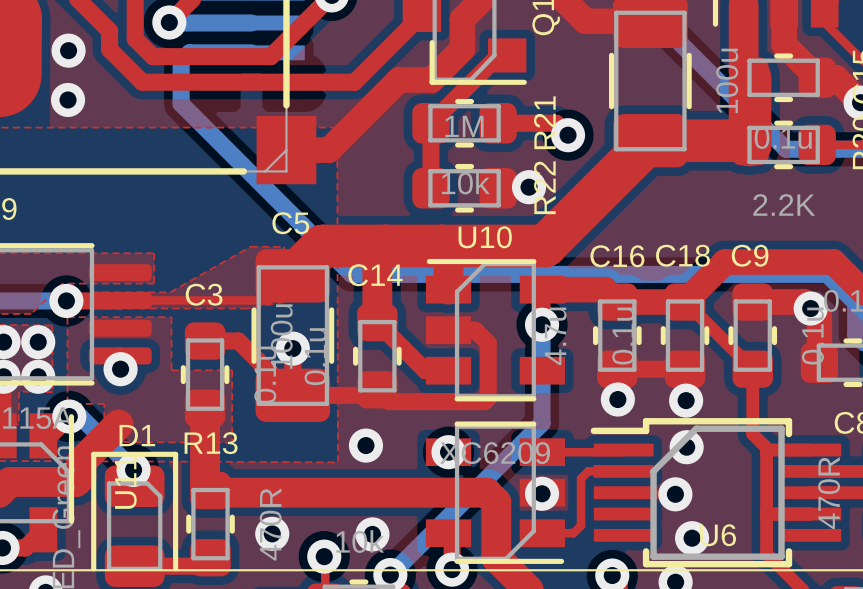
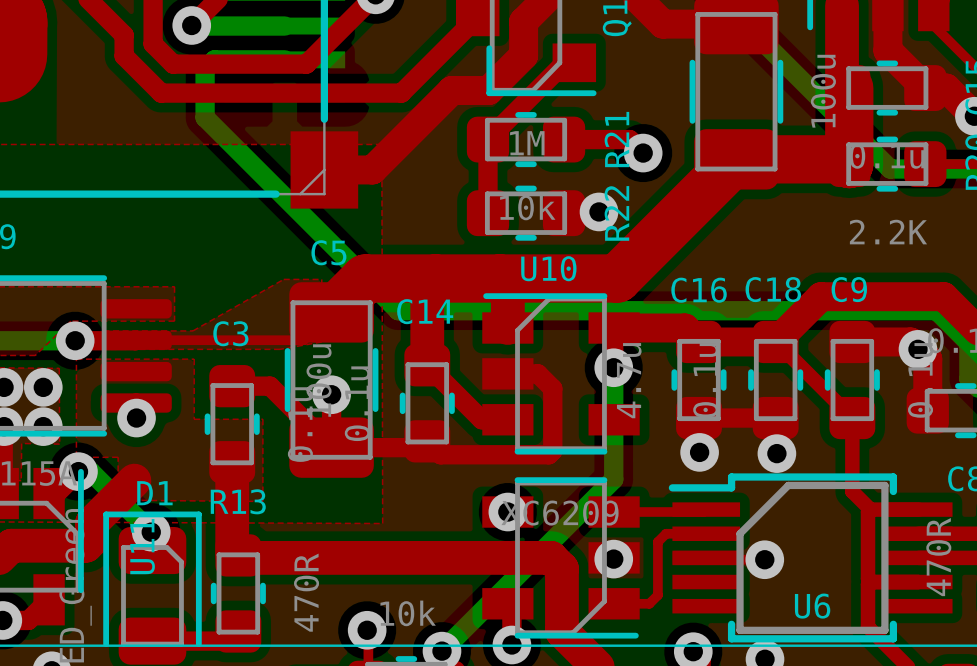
via: (68, 50) -> none
via: (68, 99) -> none
via: (365, 445) -> none
via: (686, 447) -> none
via: (272, 533) -> none
via: (372, 534) -> none
via: (692, 538) -> none

